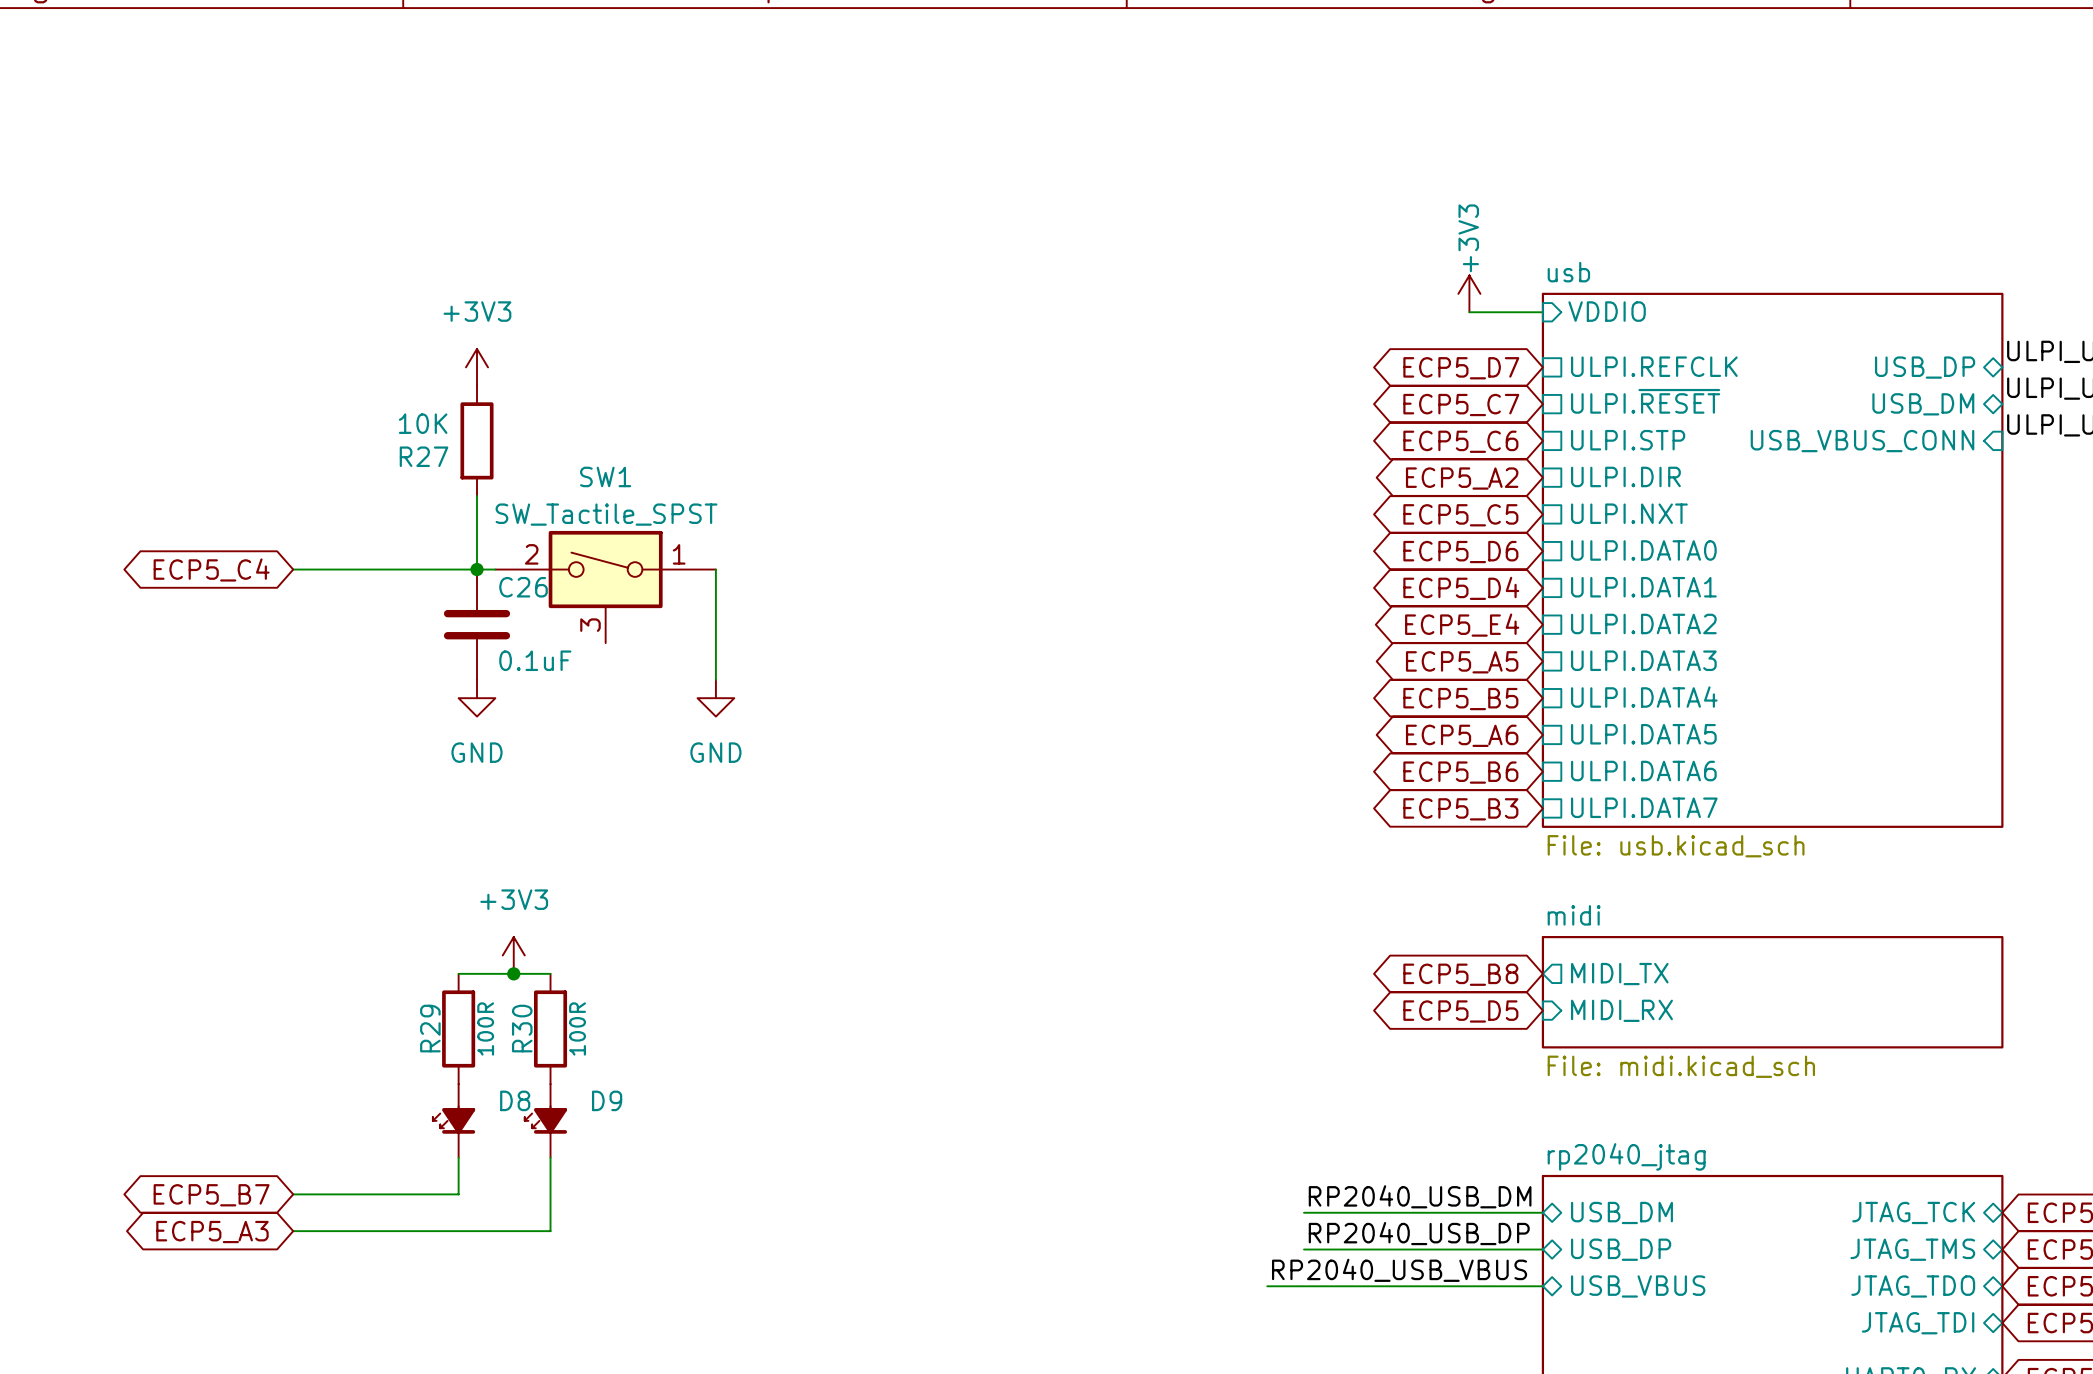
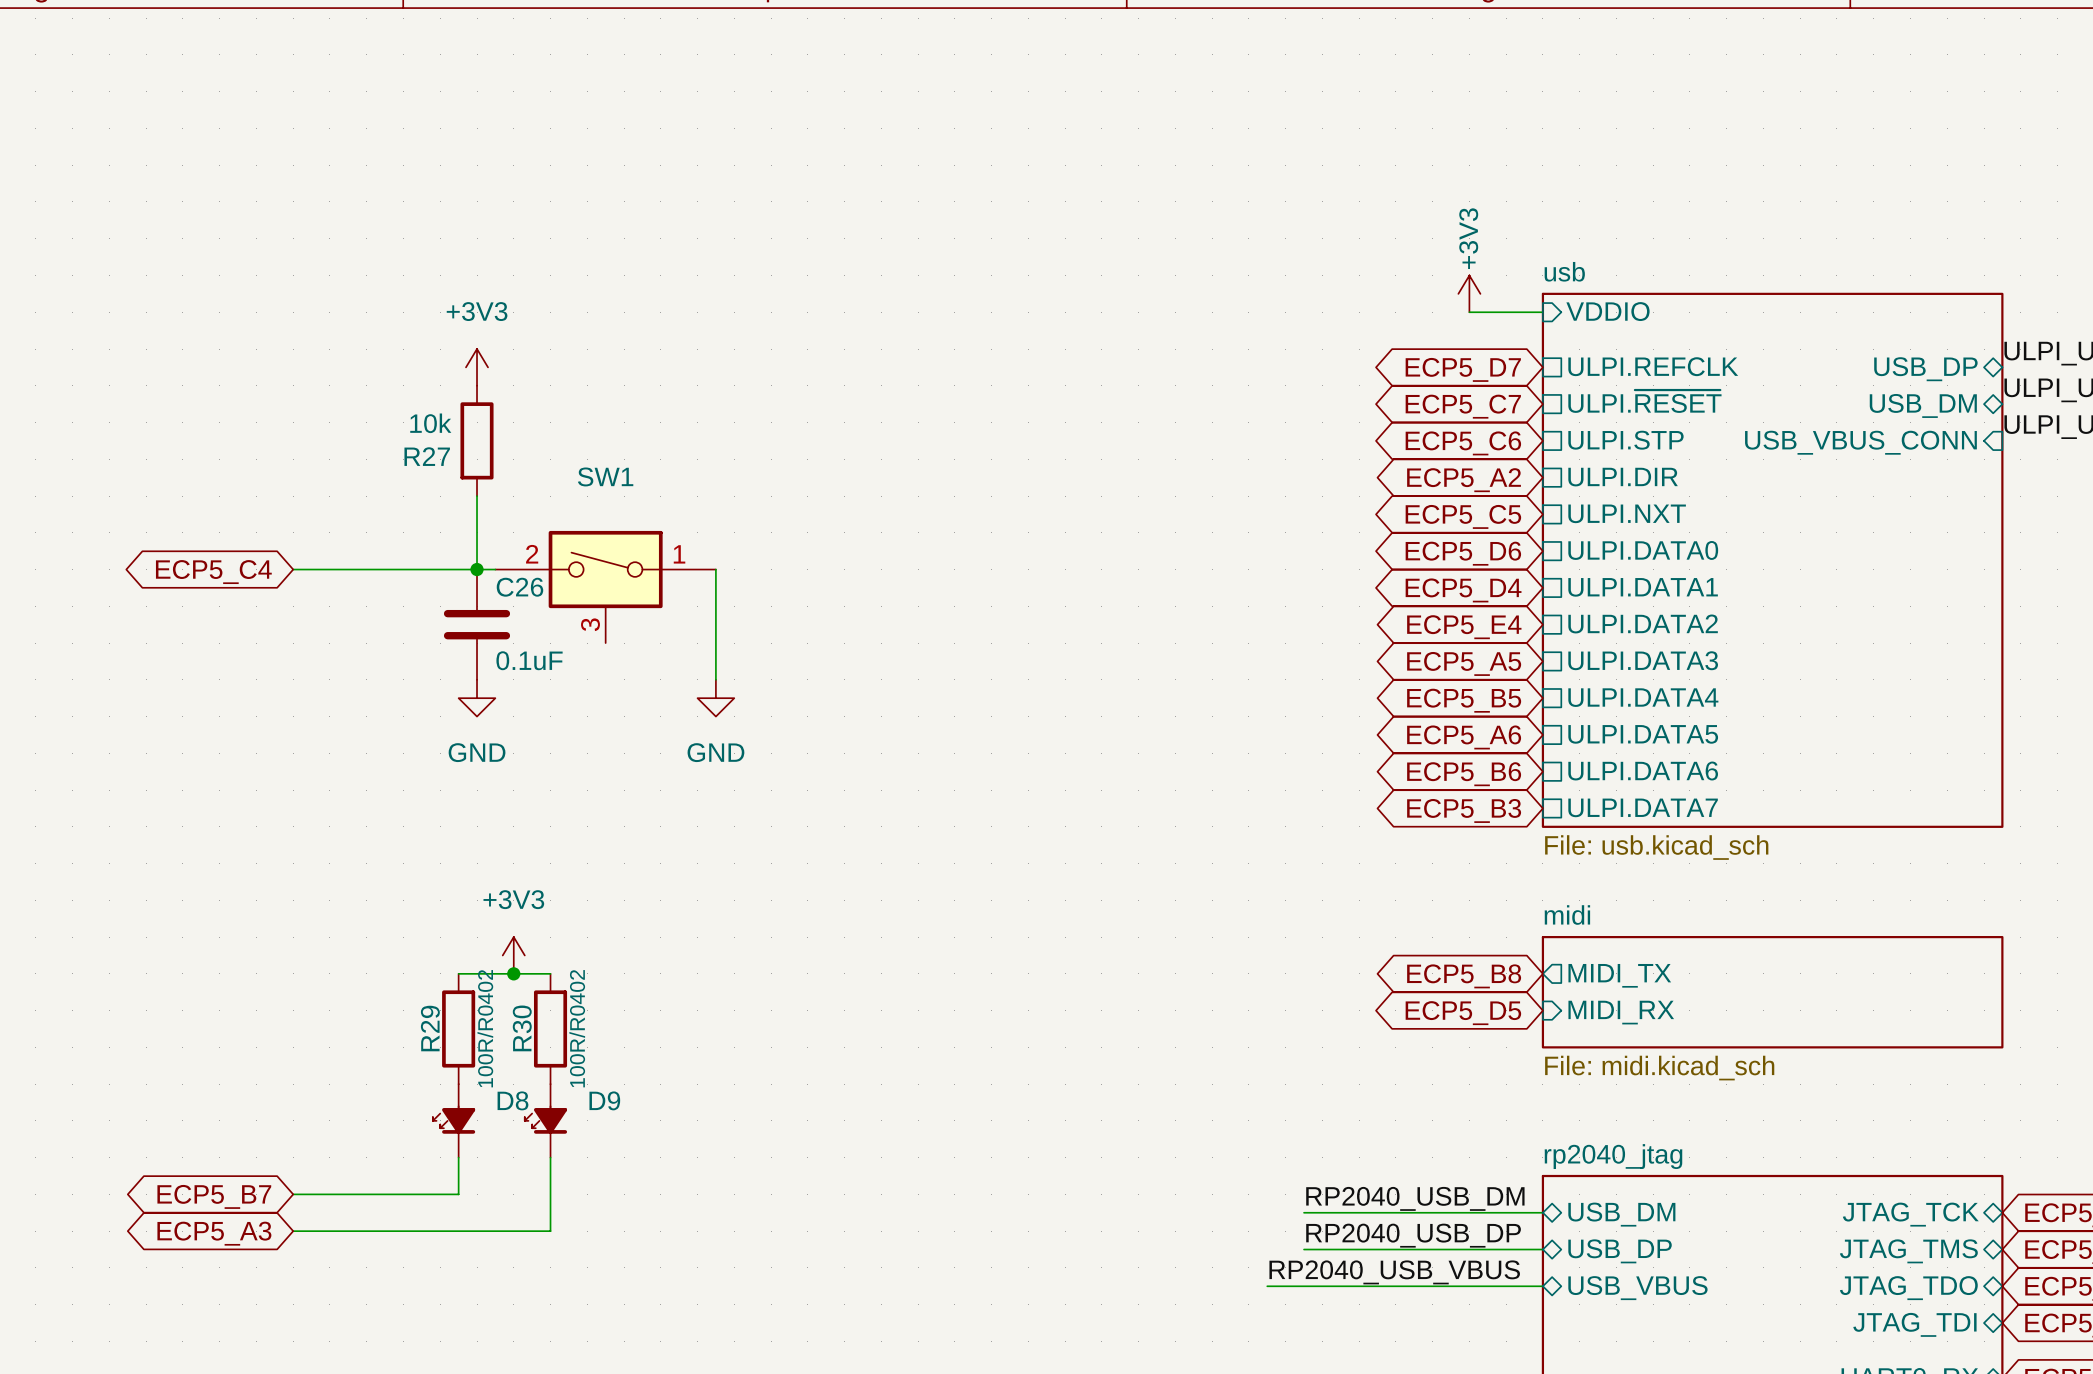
R27 value: 10K (423, 423) -> 10k (430, 423)
SW1 value: SW_Tactile_SPST (606, 514) -> none
R29 value: 100R (485, 1028) -> 100R/R0402 (485, 1028)
R30 value: 100R (577, 1028) -> 100R/R0402 (577, 1028)

